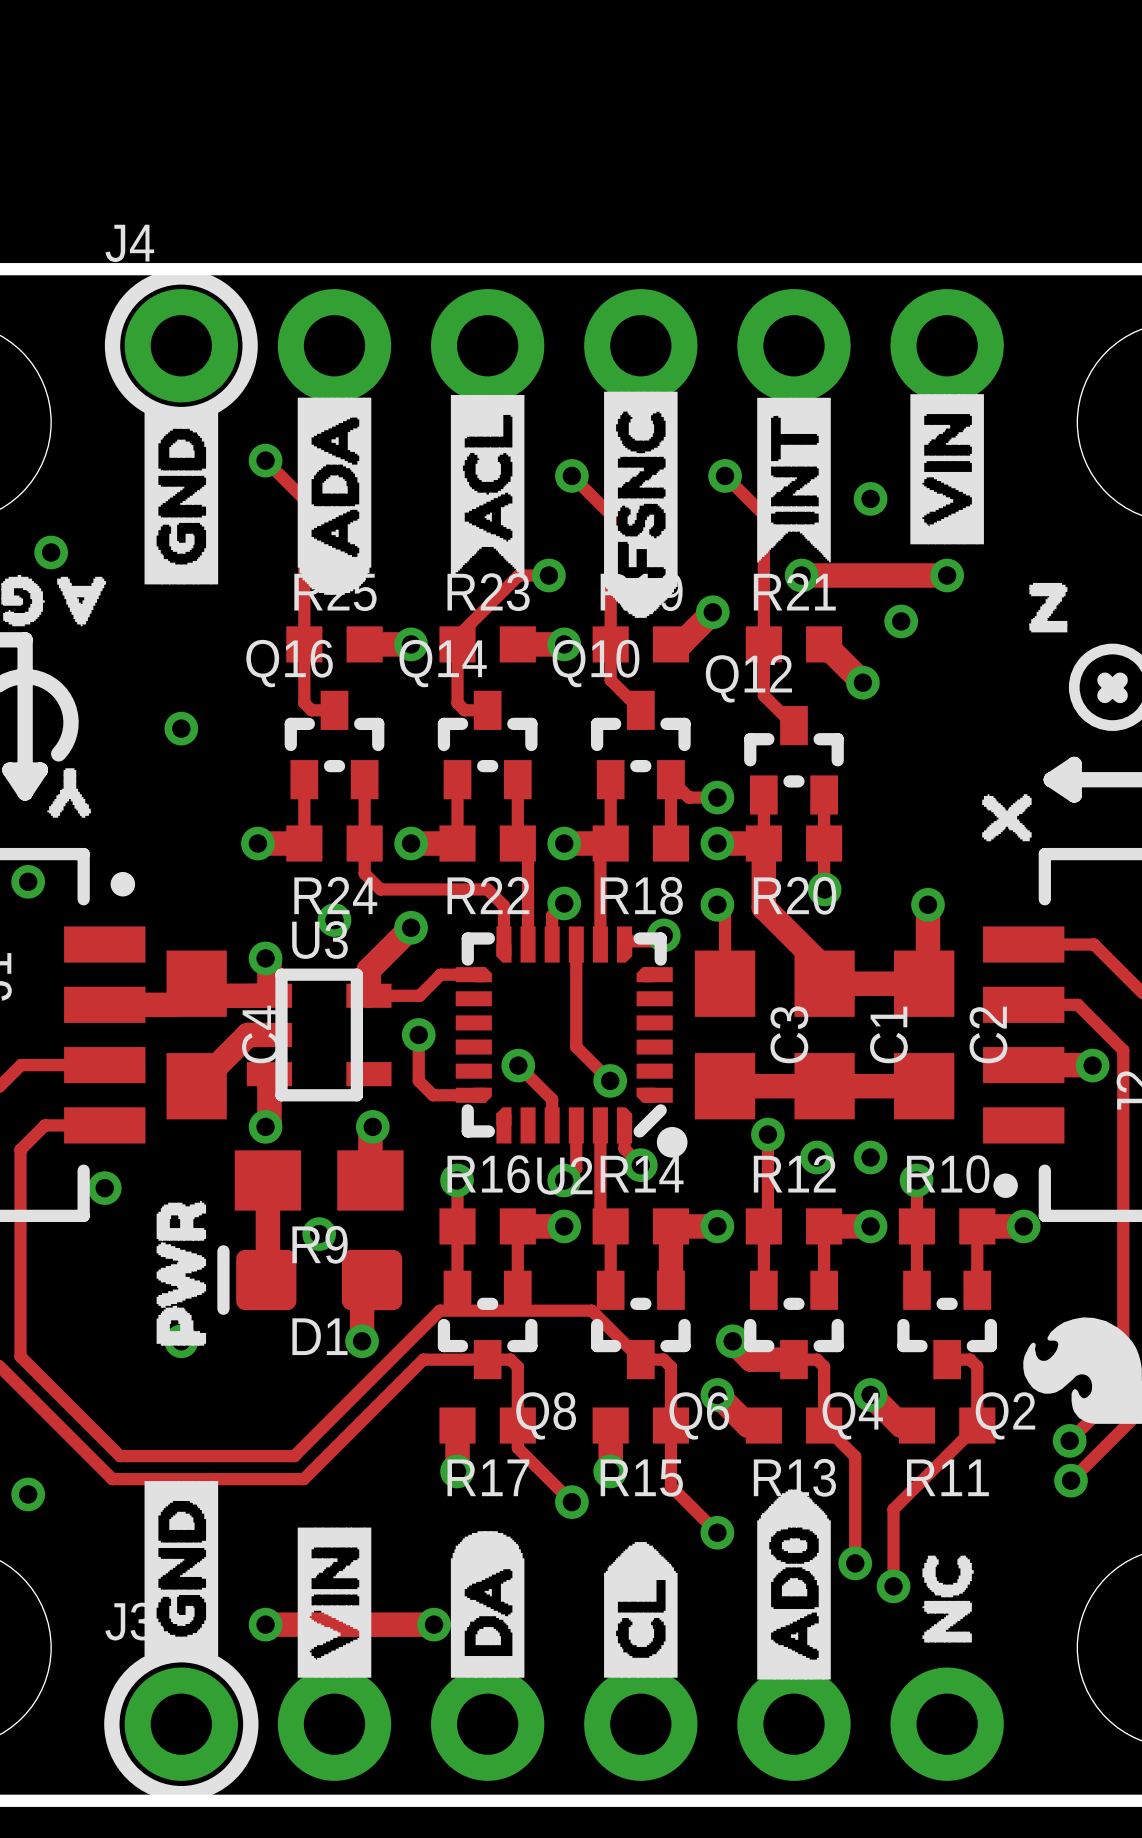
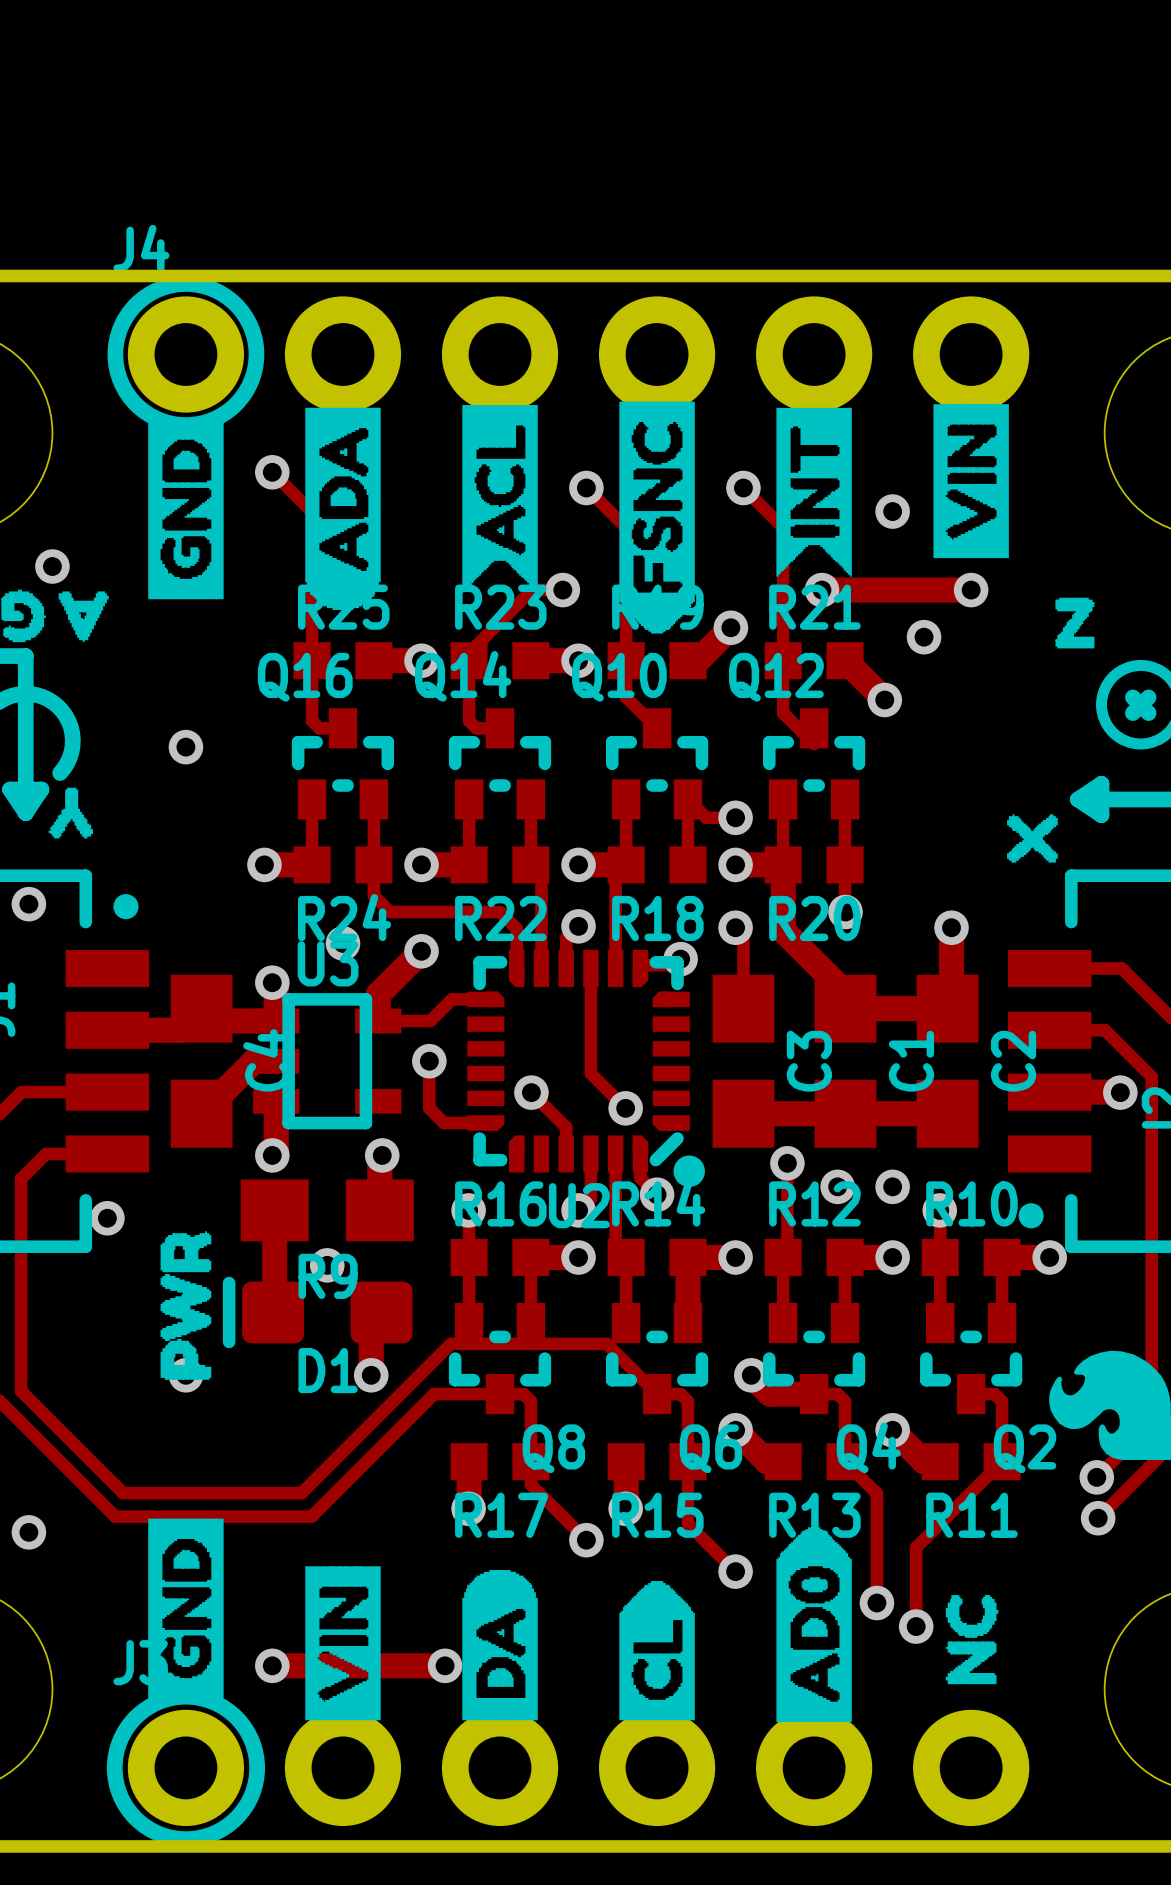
Q12 position: (793, 760) -> (814, 763)

